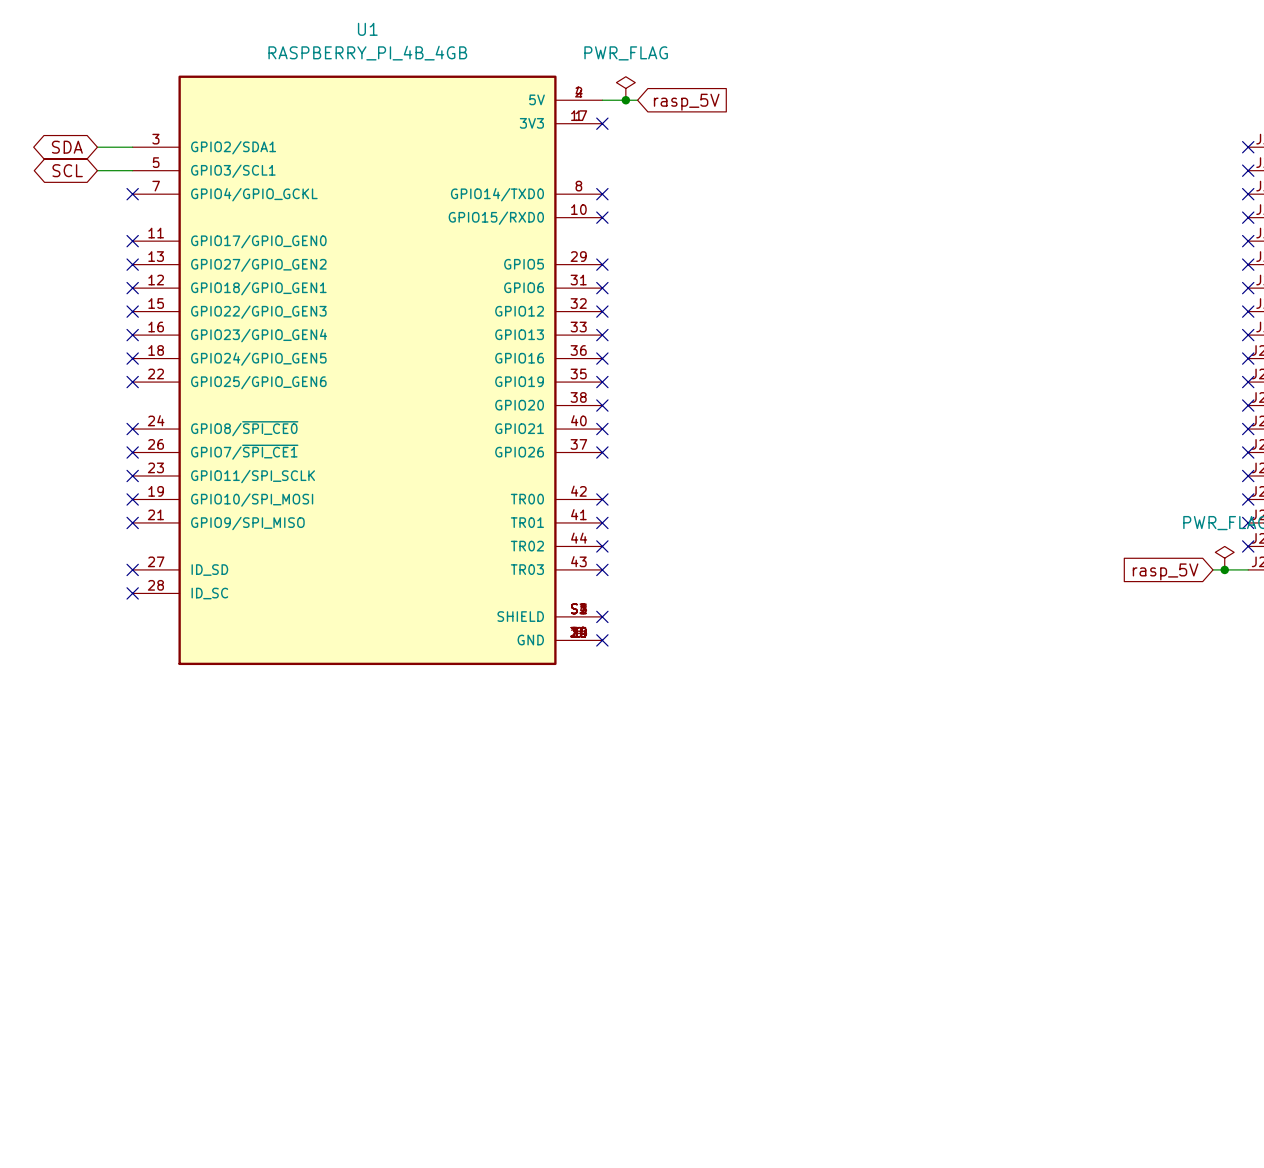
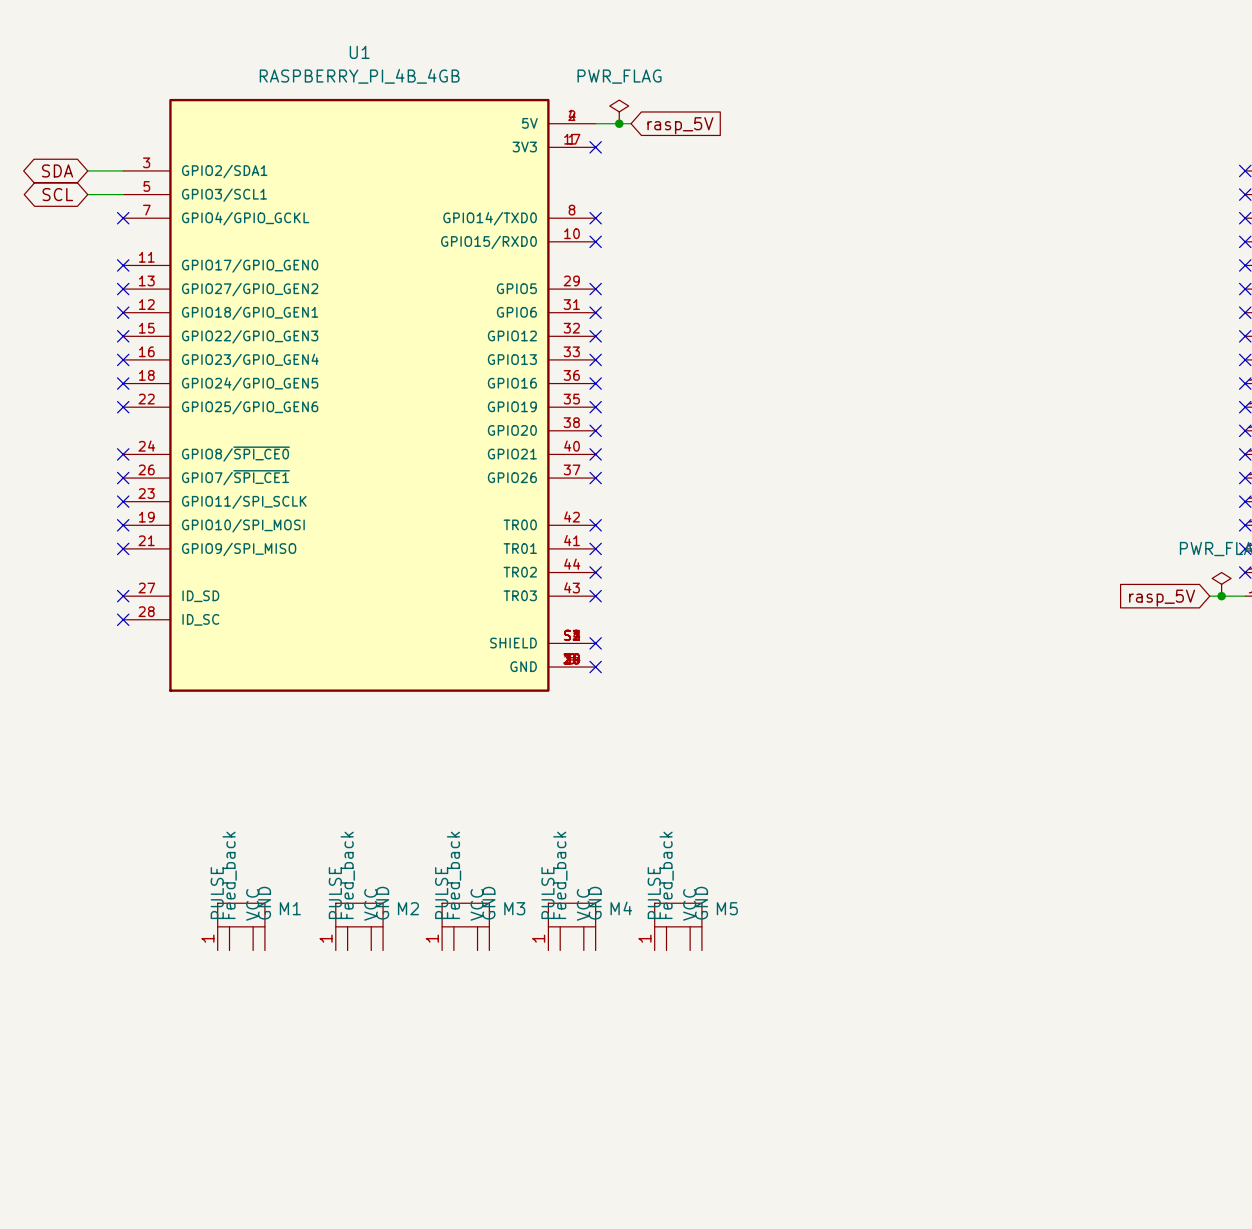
M1: none -> (241, 926)
M2: none -> (359, 926)
M3: none -> (465, 926)
M4: none -> (572, 926)
M5: none -> (678, 926)

